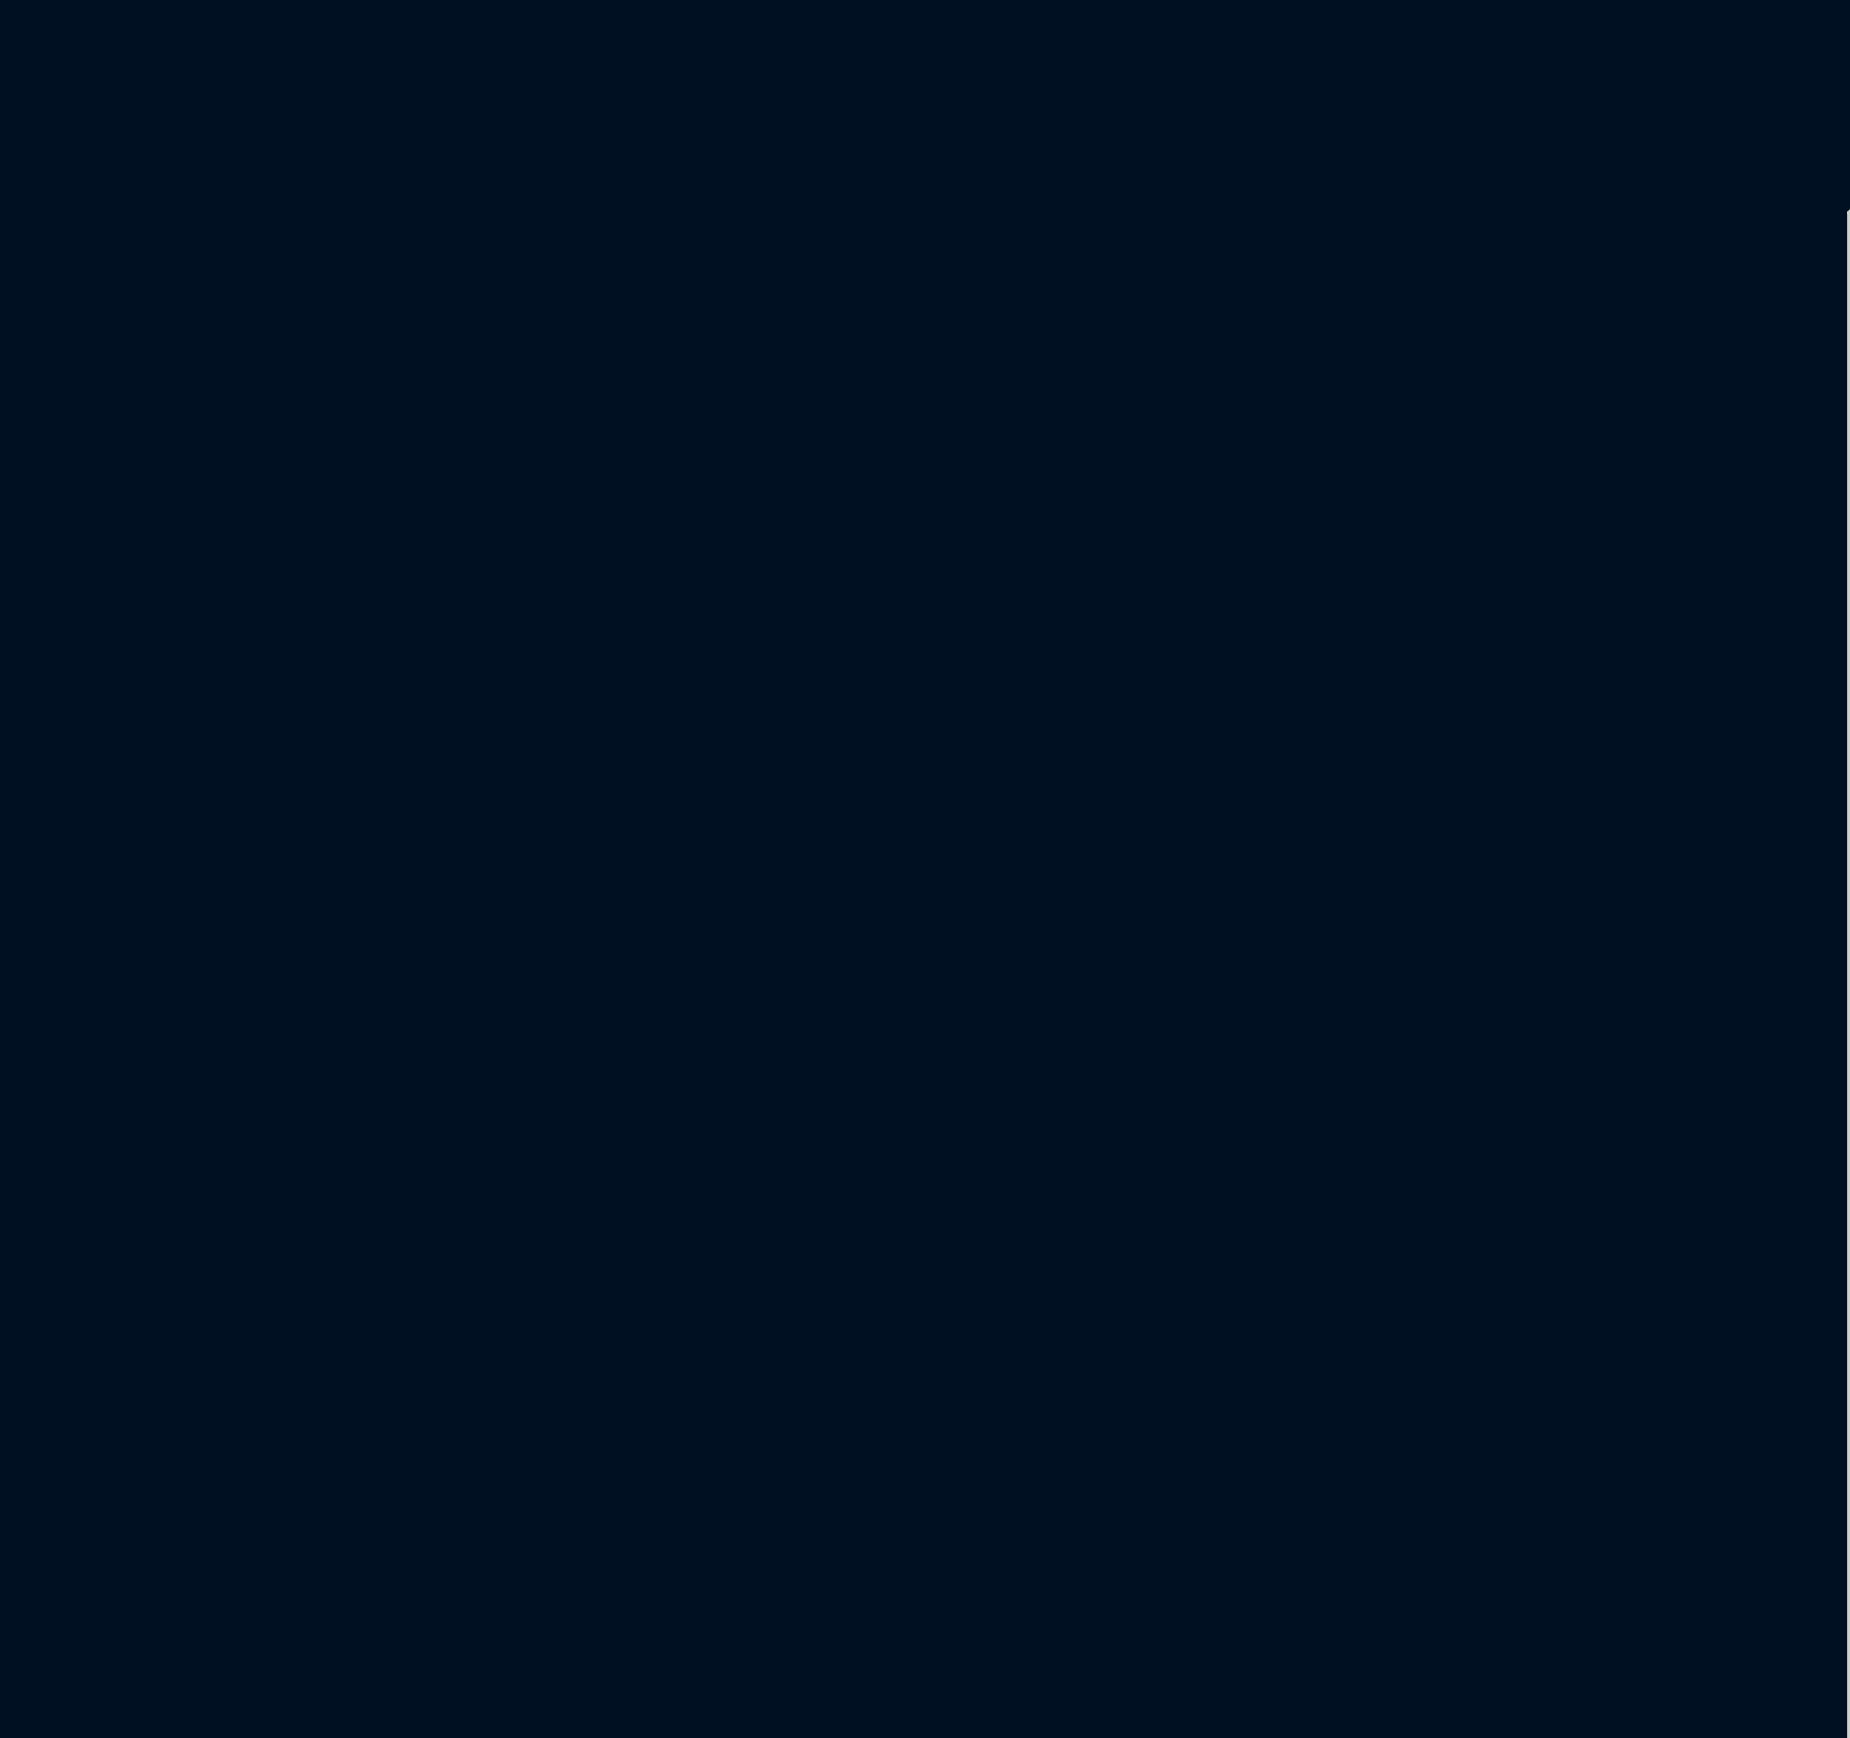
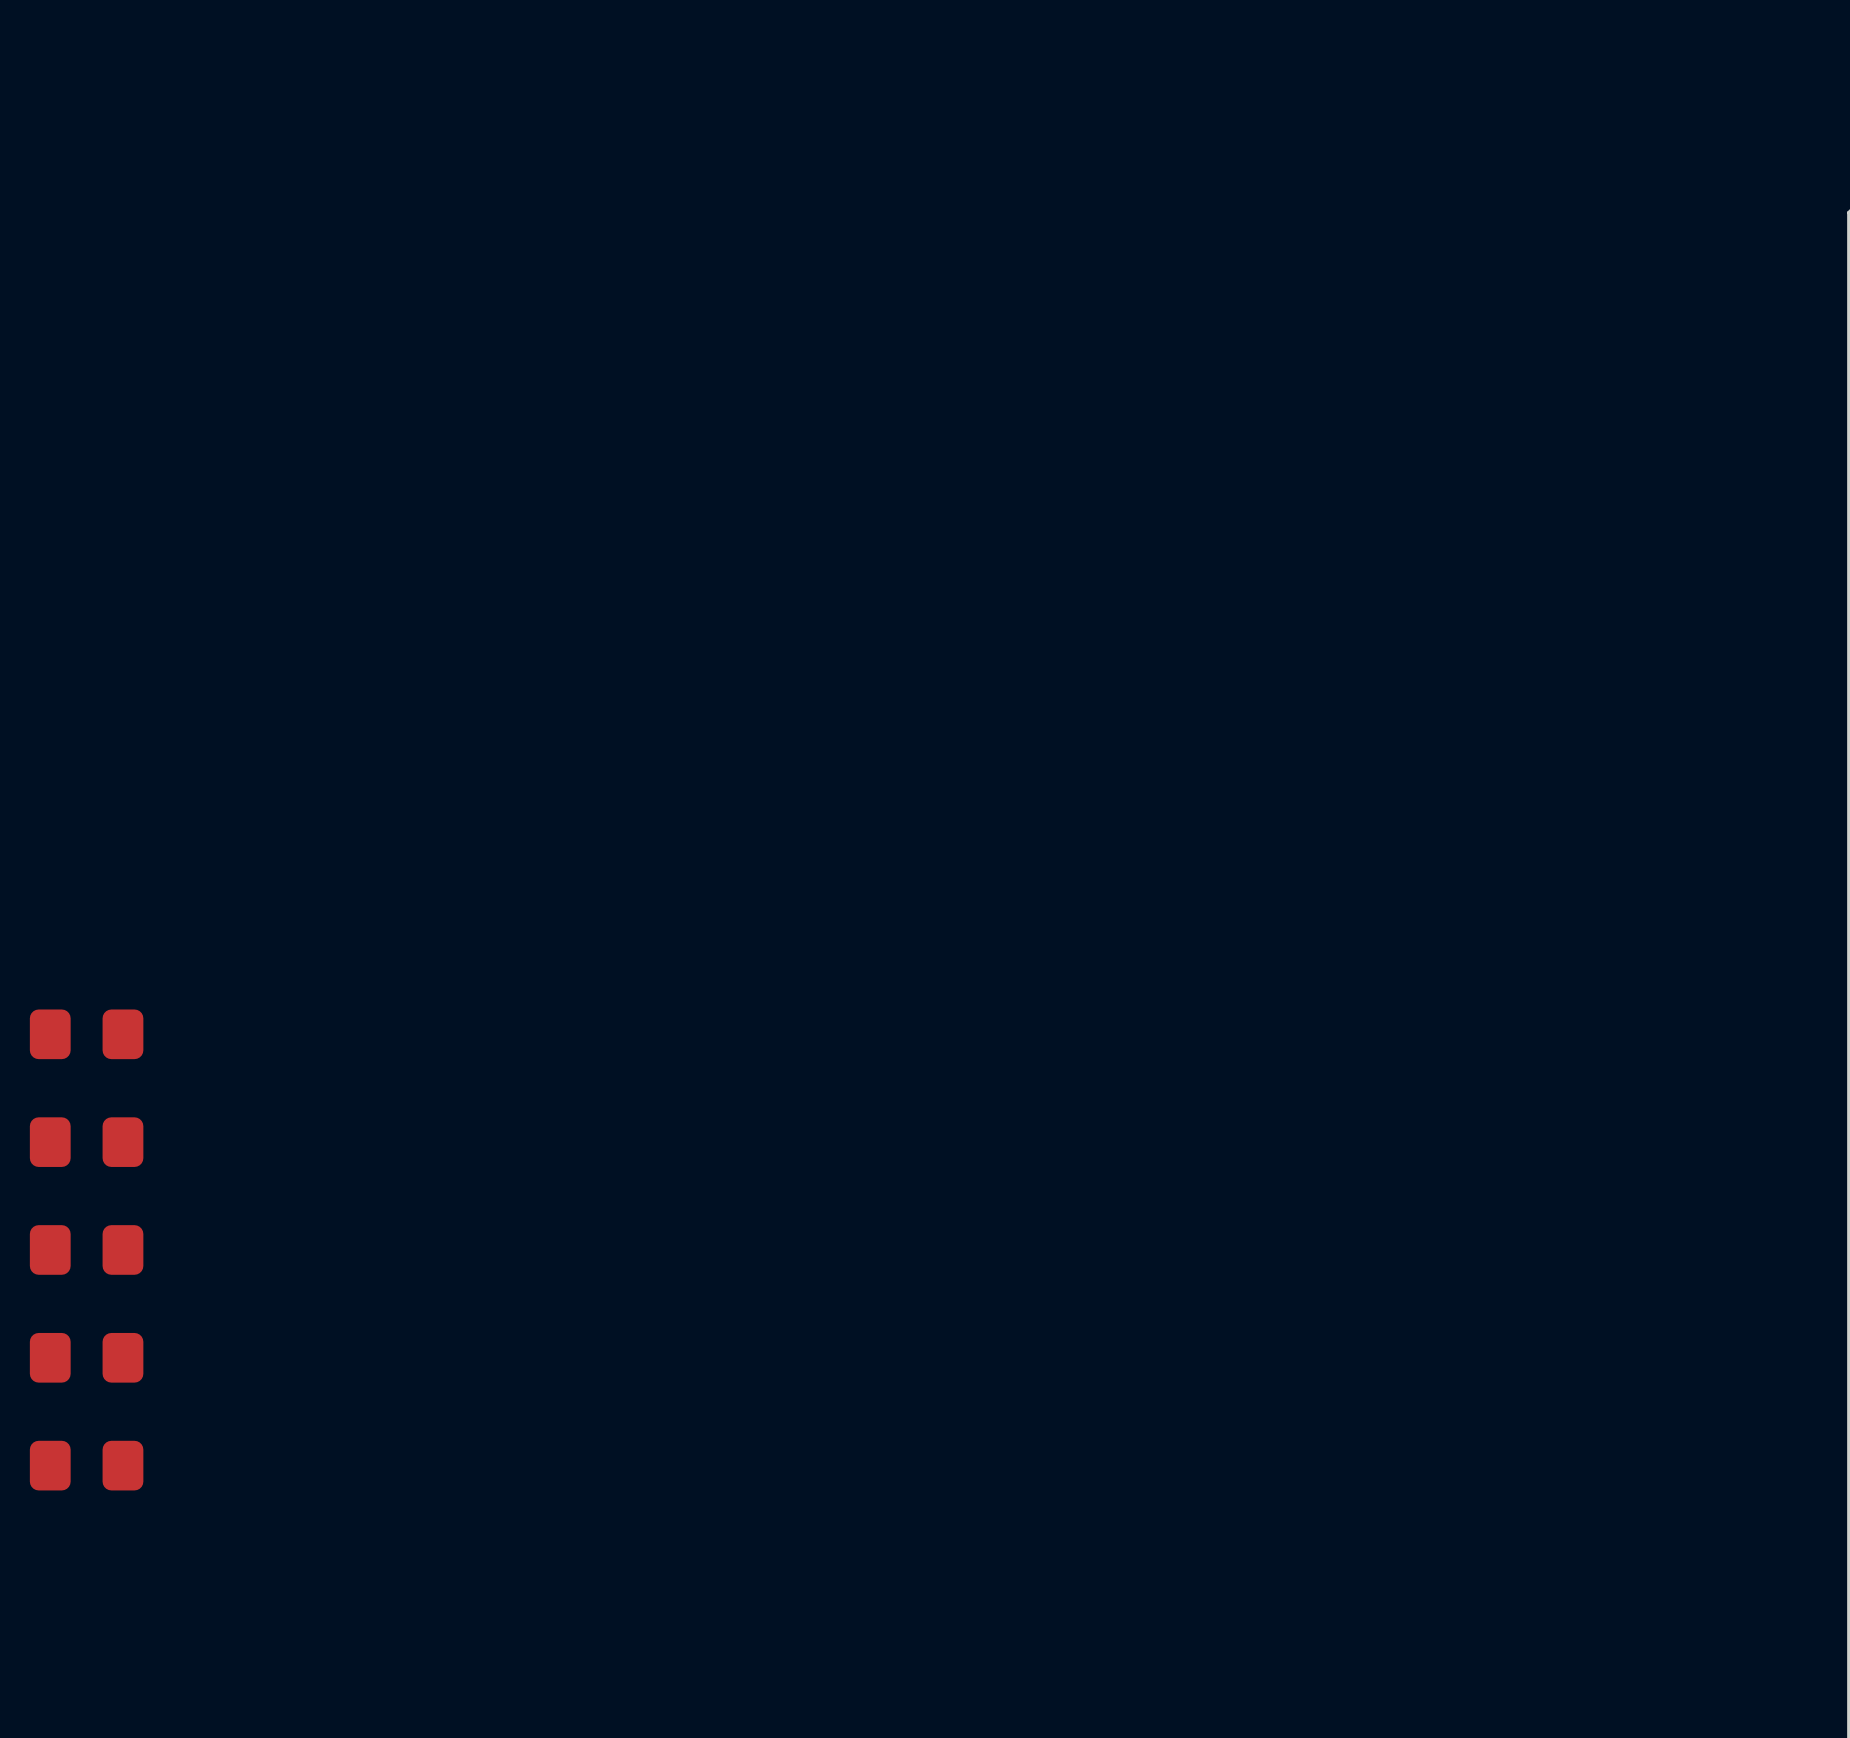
part: none -> (86, 1034)
part: none -> (86, 1142)
part: none -> (86, 1249)
part: none -> (86, 1357)
part: none -> (86, 1465)

